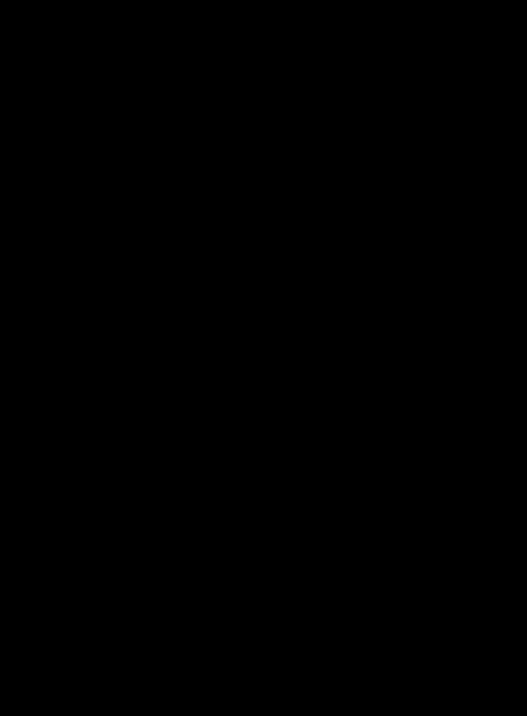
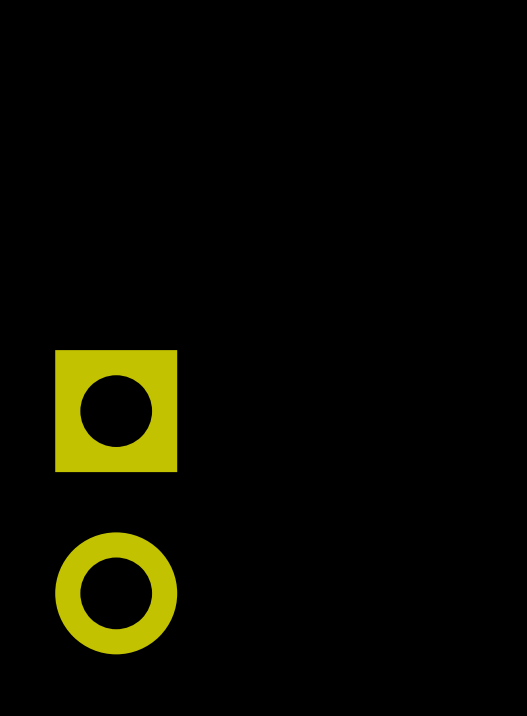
part: none -> (116, 502)

